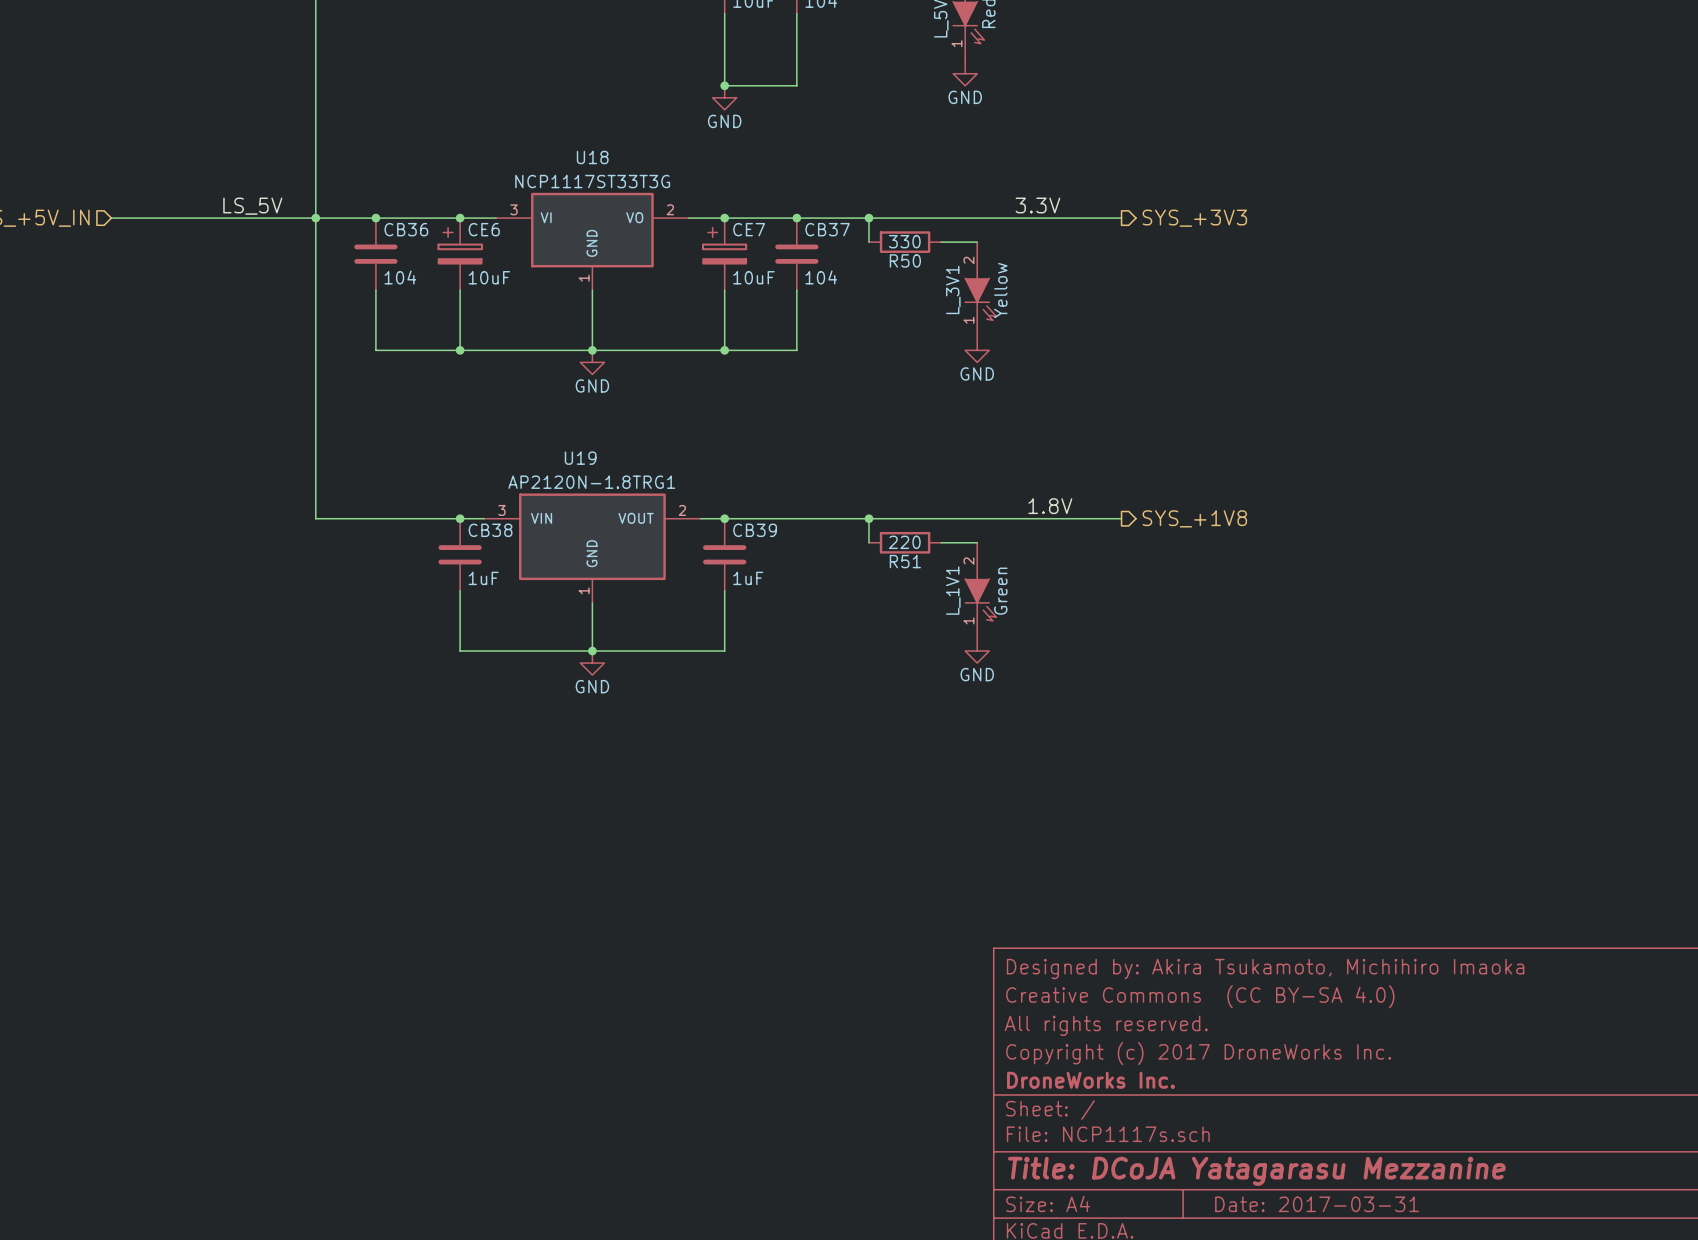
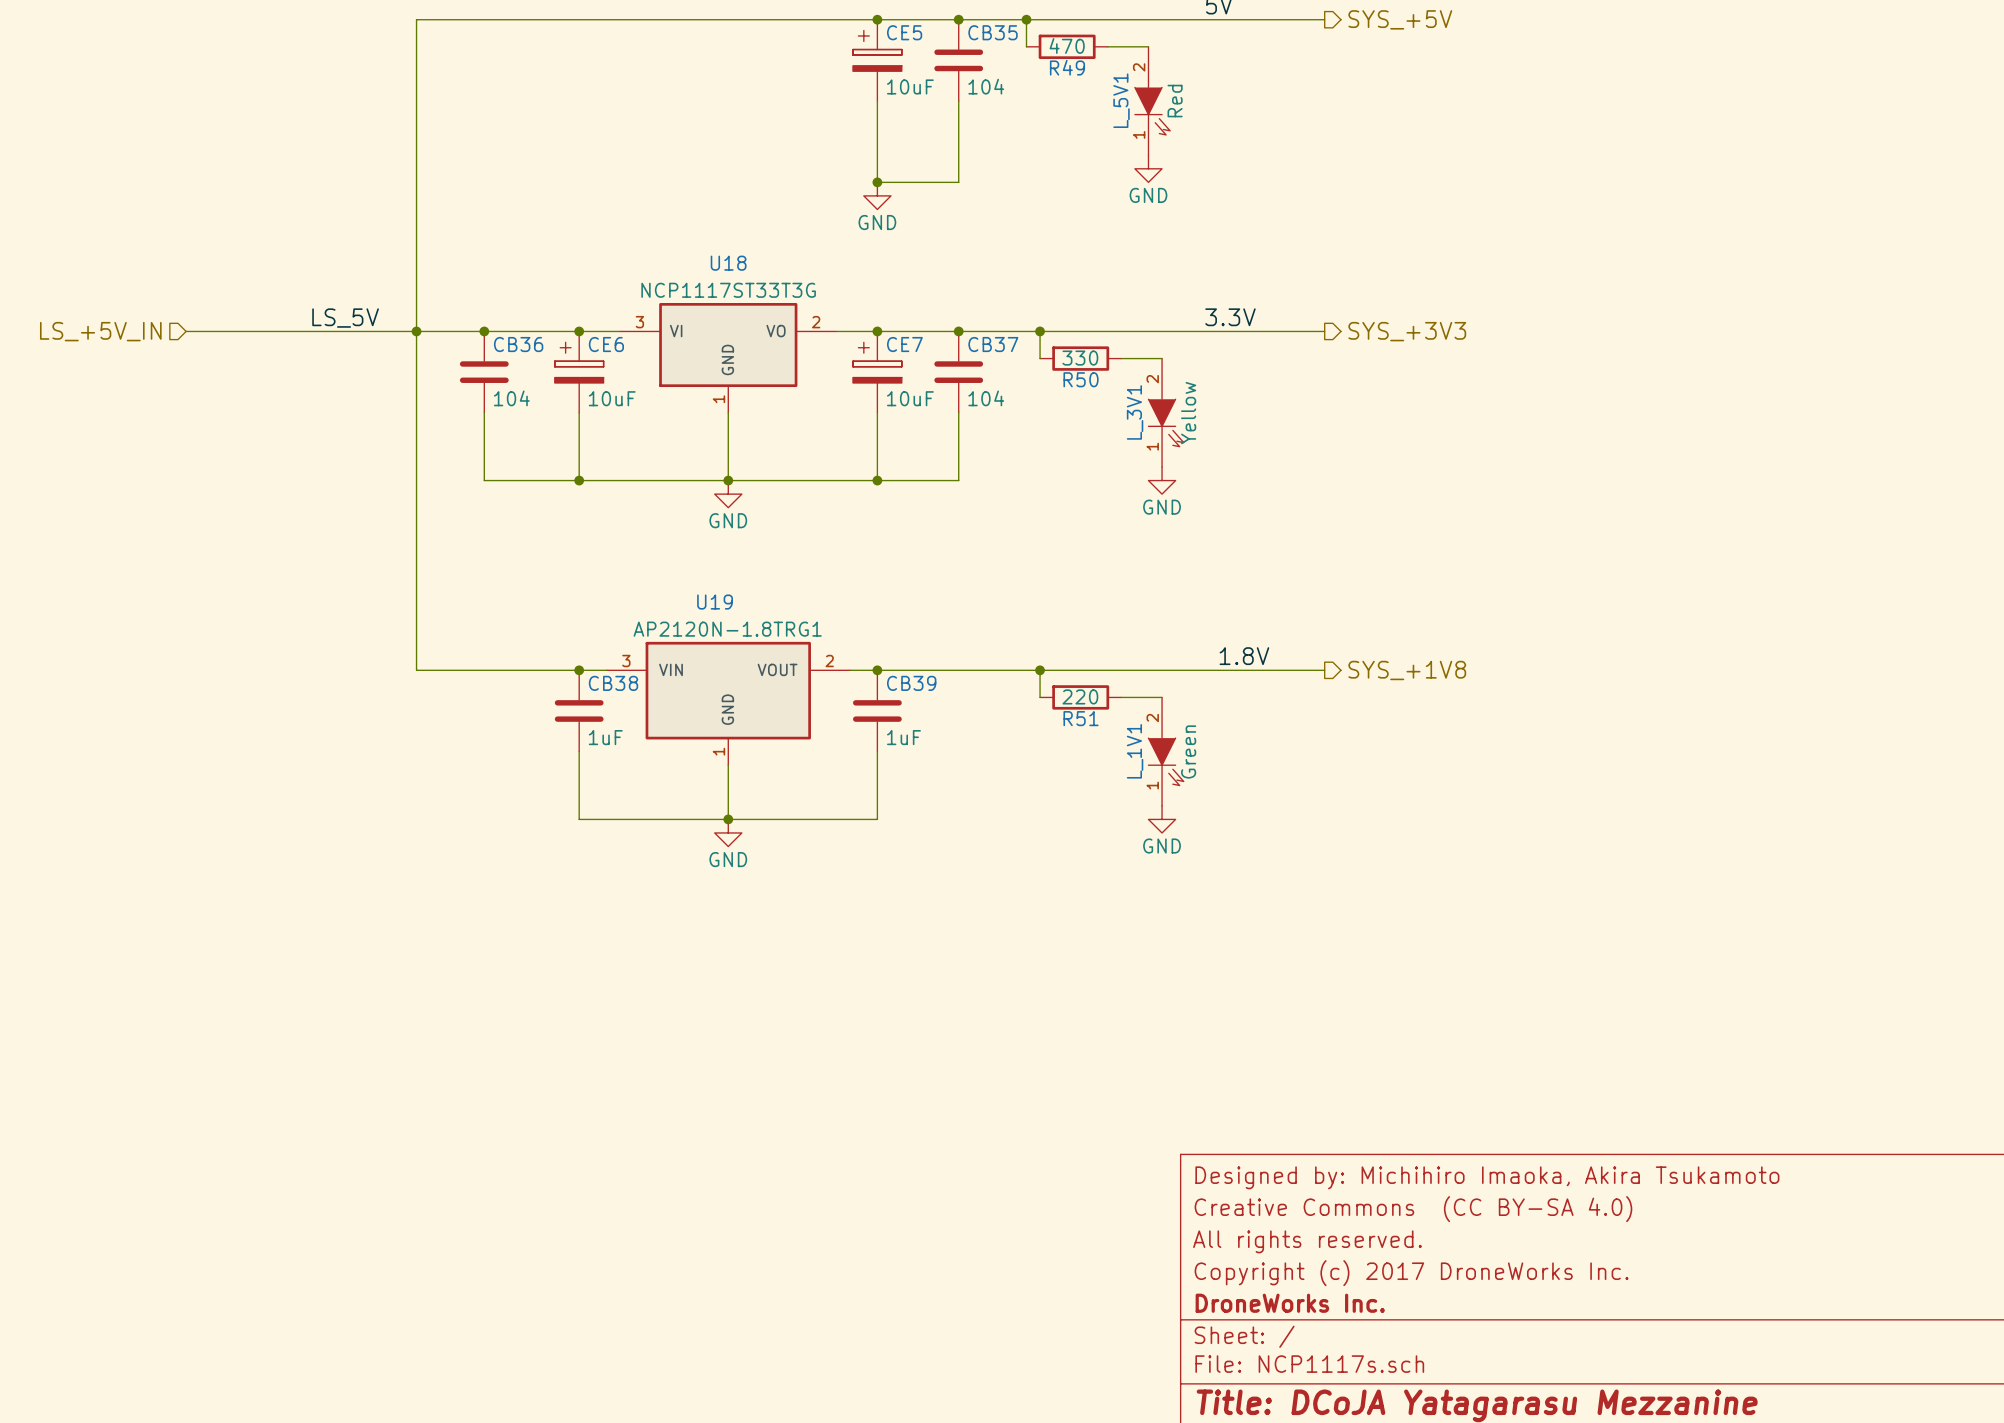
title block: Designed by: Akira Tsukamoto, Michihiro Imaoka (1265, 969) -> Designed by: Michihiro Imaoka, Akira Tsukamoto (1487, 1177)

